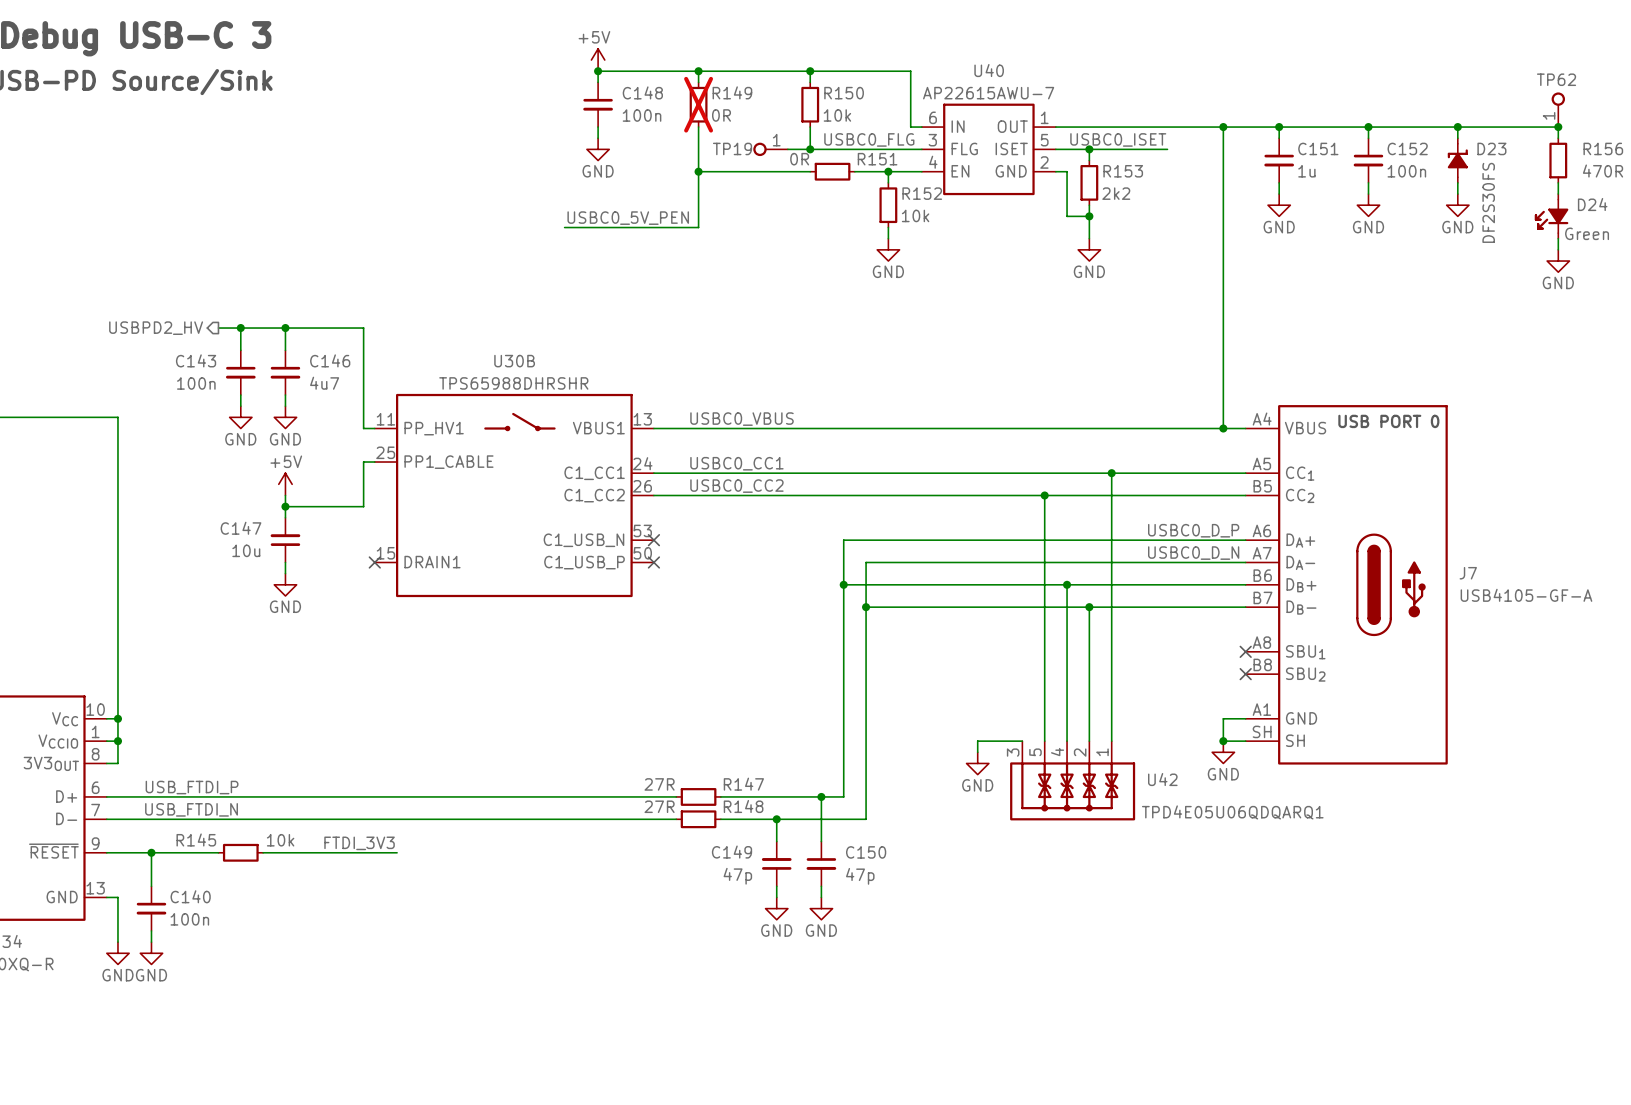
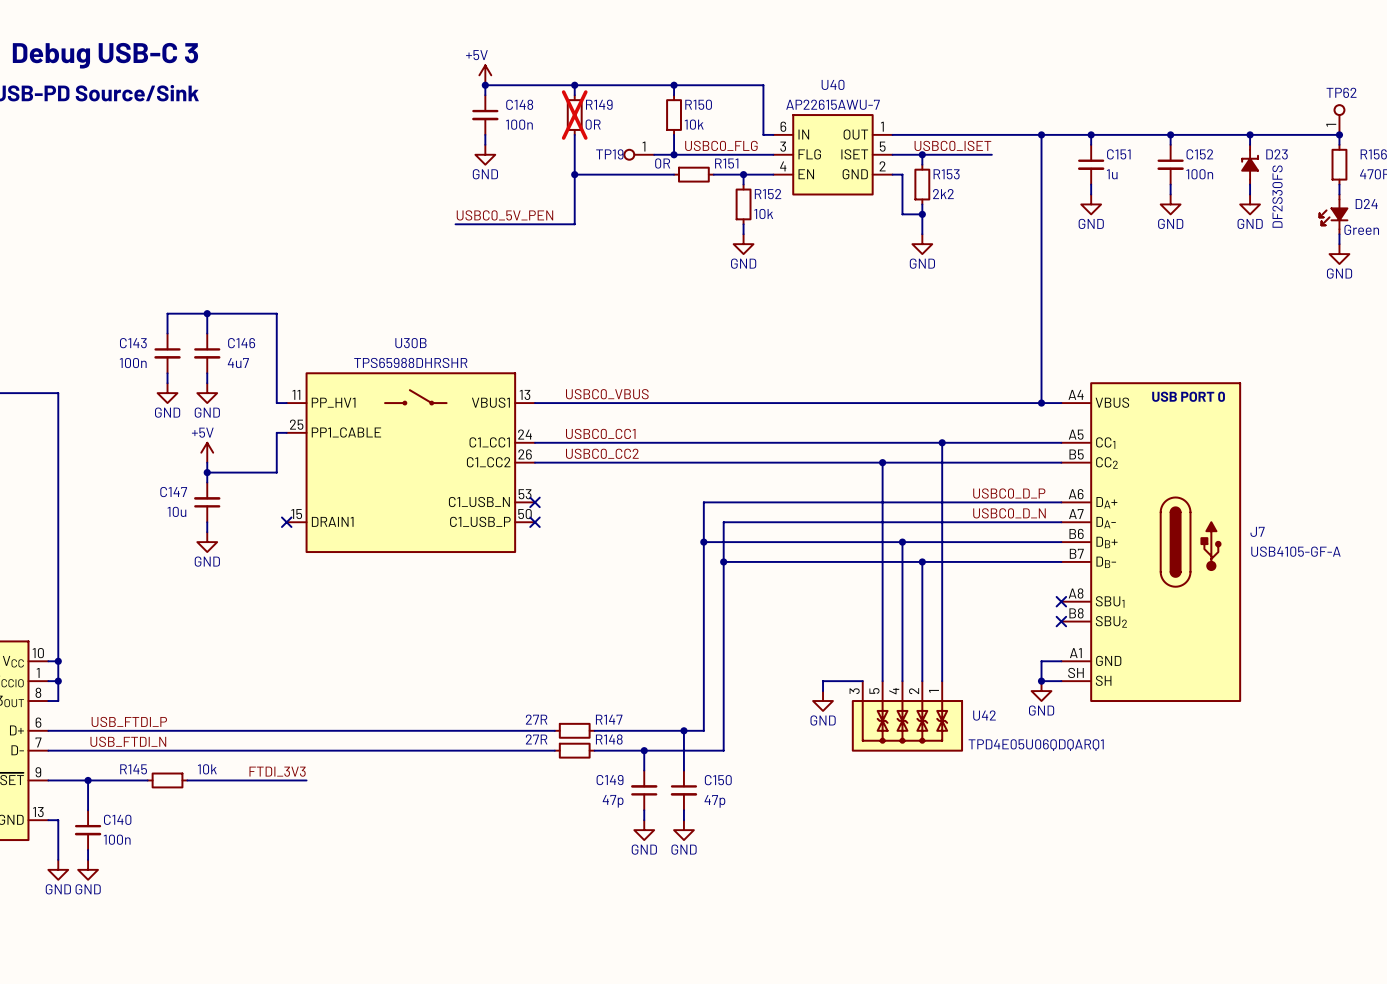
hierarchical label: USBPD2_HV (156, 328) -> none
wire: (218, 328) (240, 328) -> none
junction: (240, 328) -> none

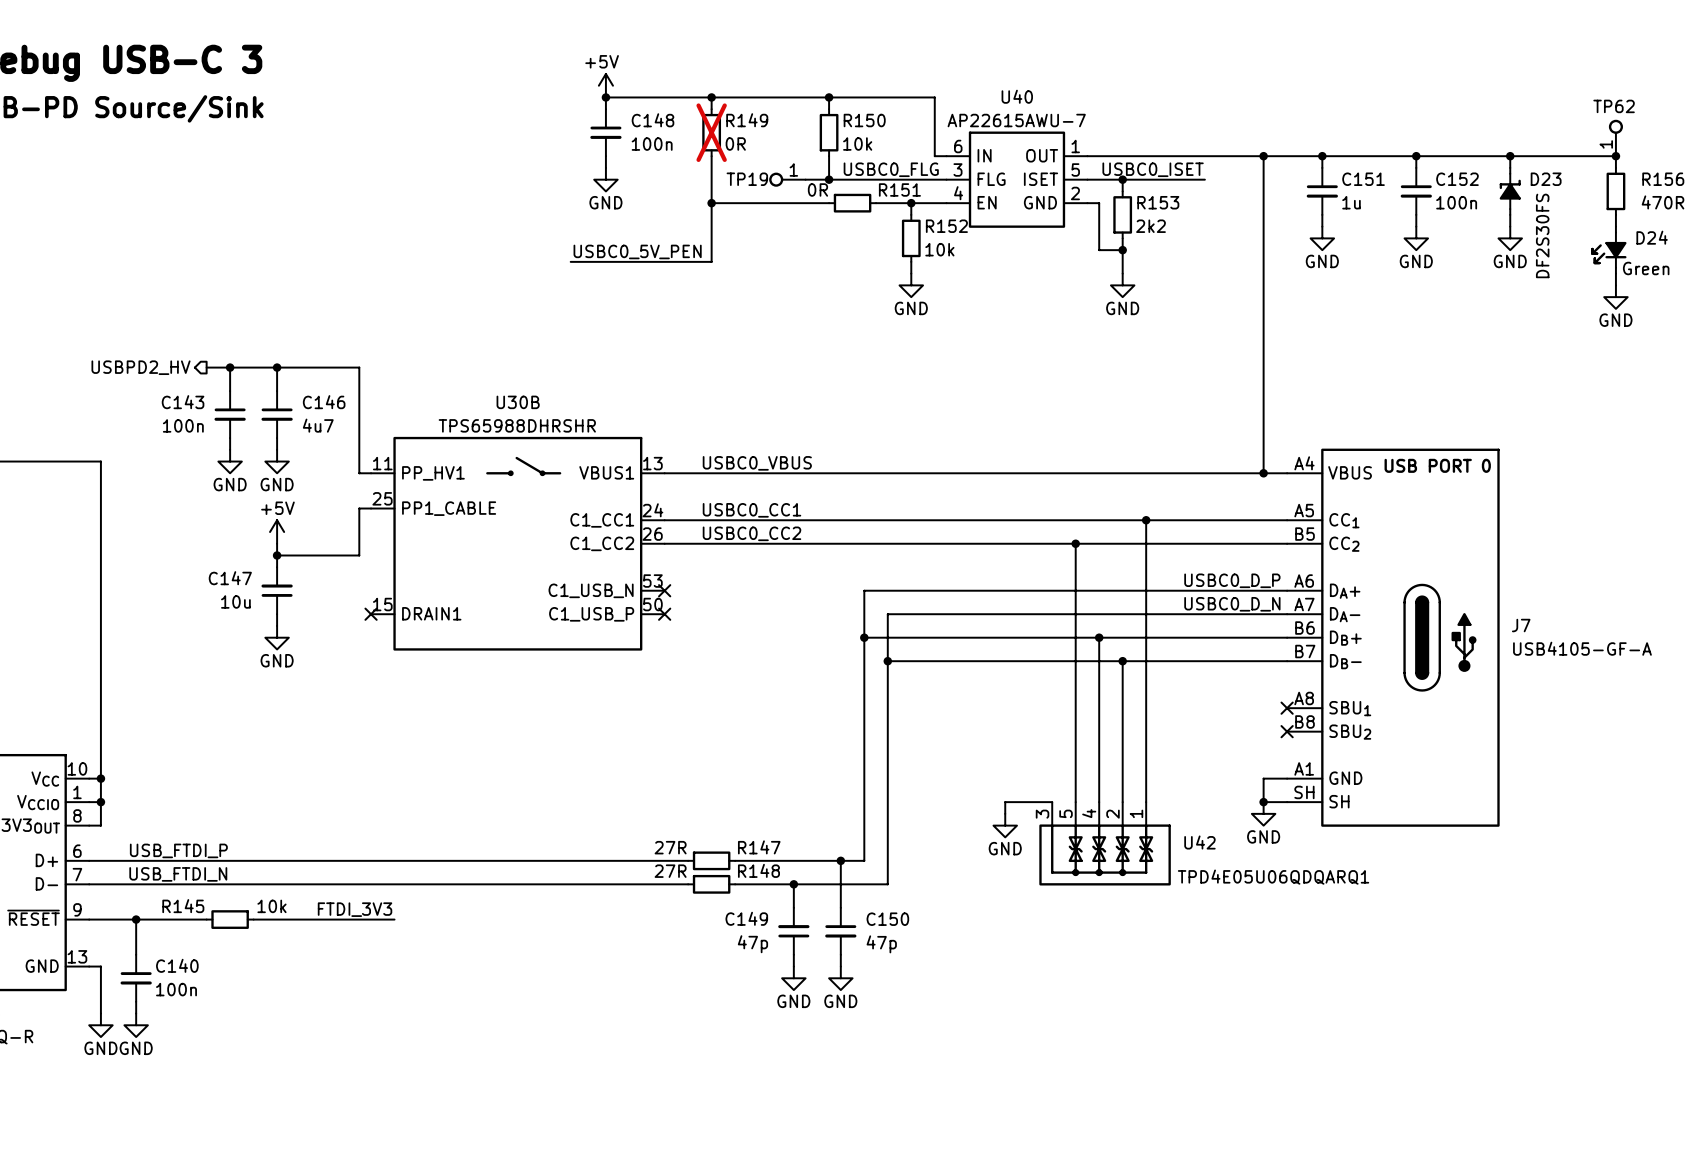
hierarchical label: none -> USBPD2_HV (141, 367)
wire: none -> (206, 367) (230, 367)
junction: none -> (230, 367)

